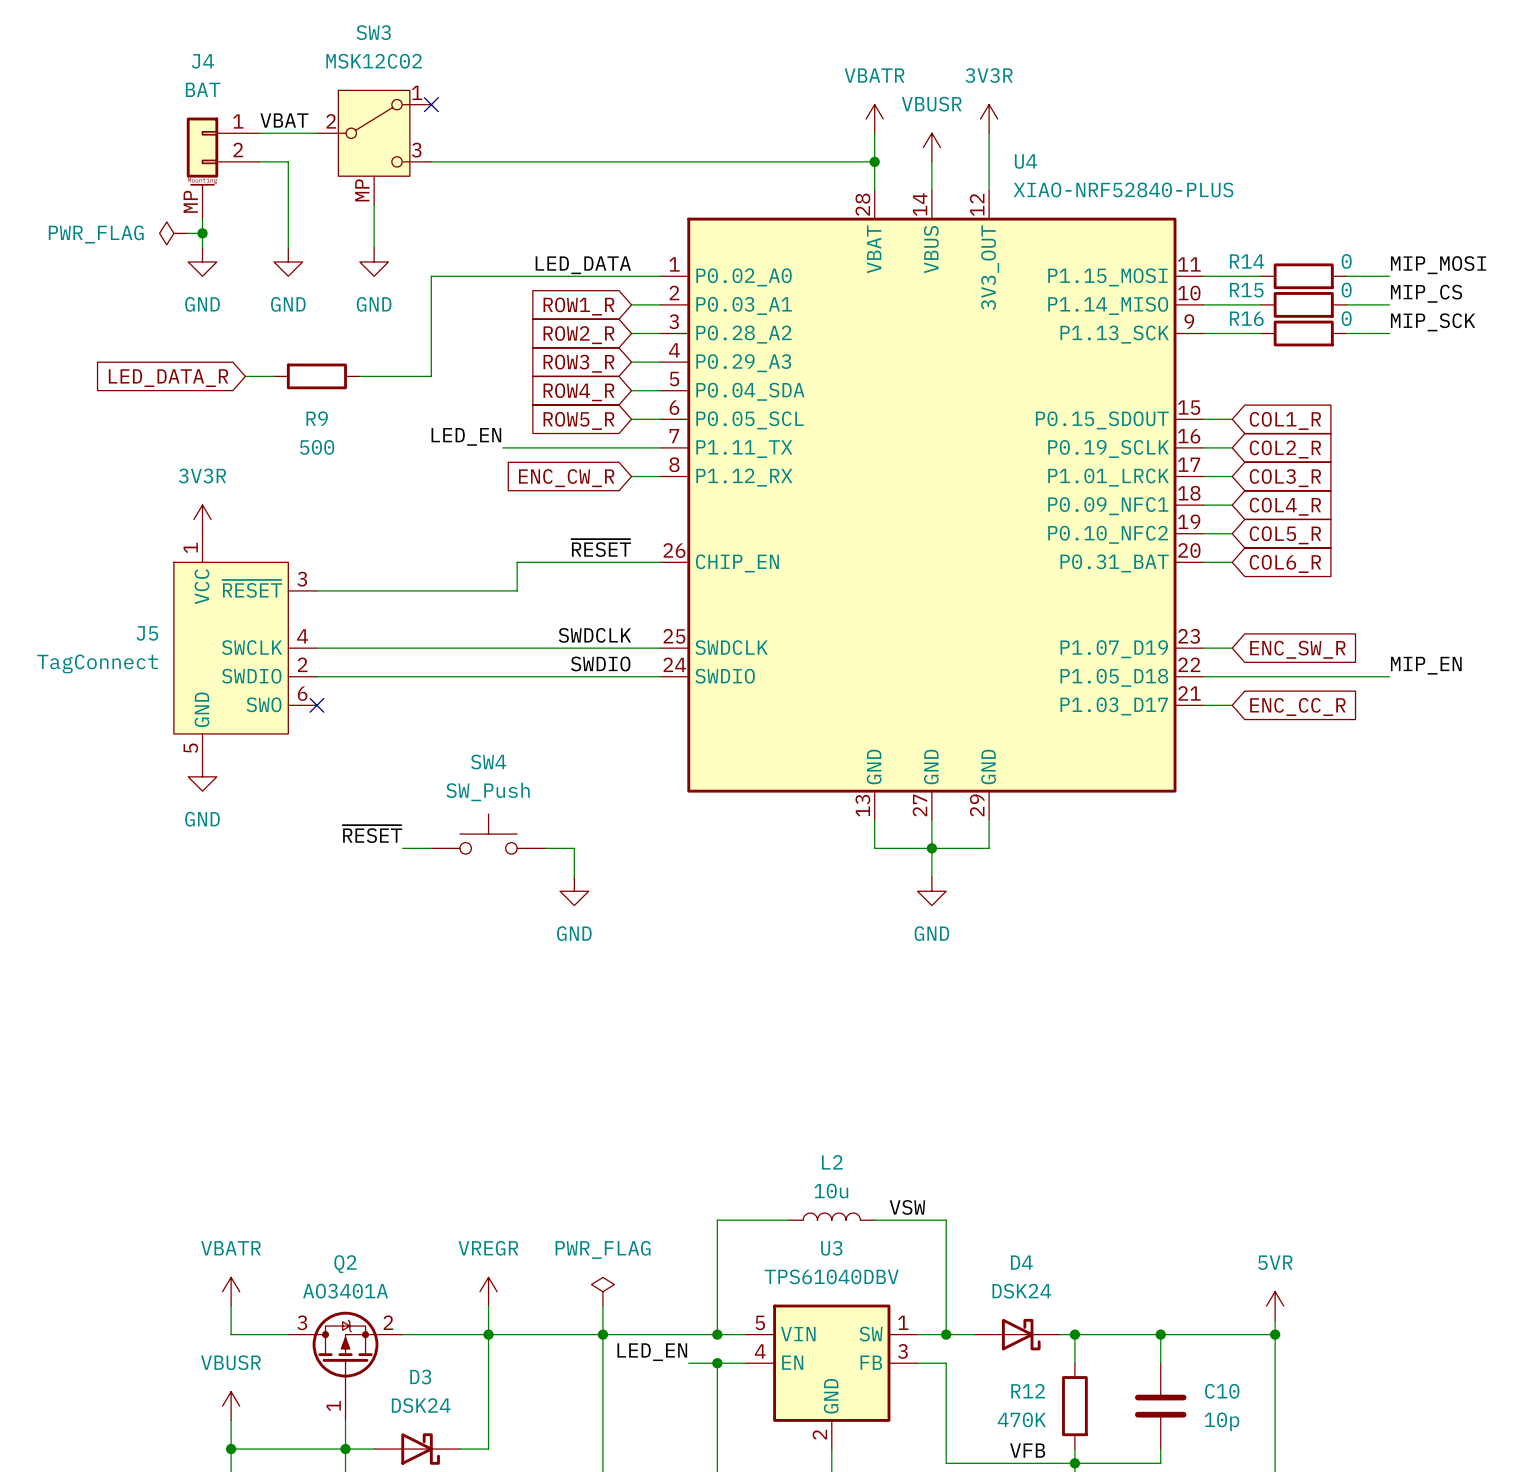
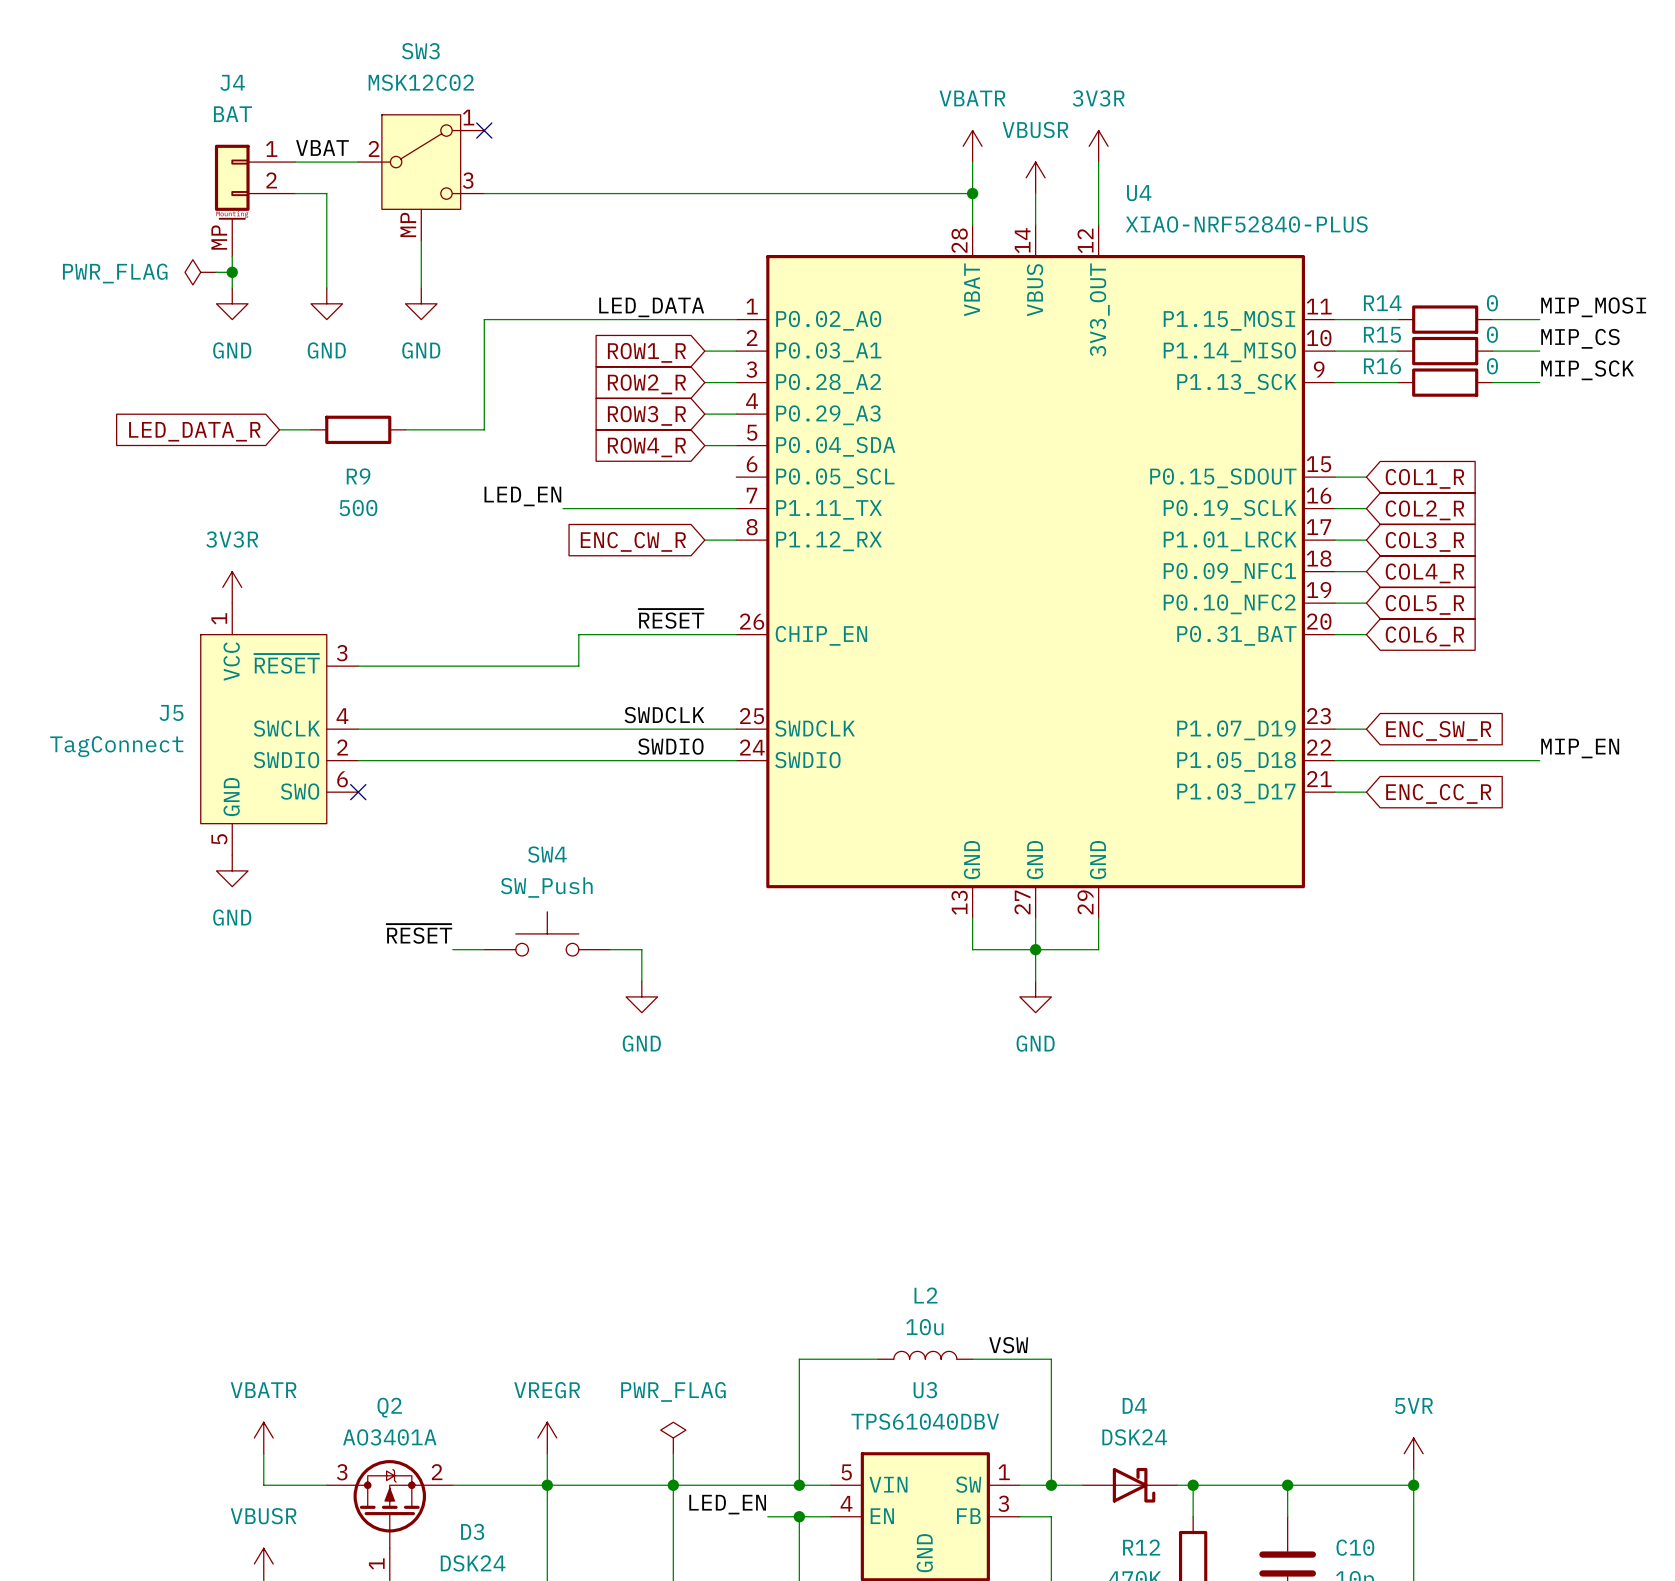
wire: (631, 419) (660, 419) -> none
global label: ROW5_R (578, 420) -> none

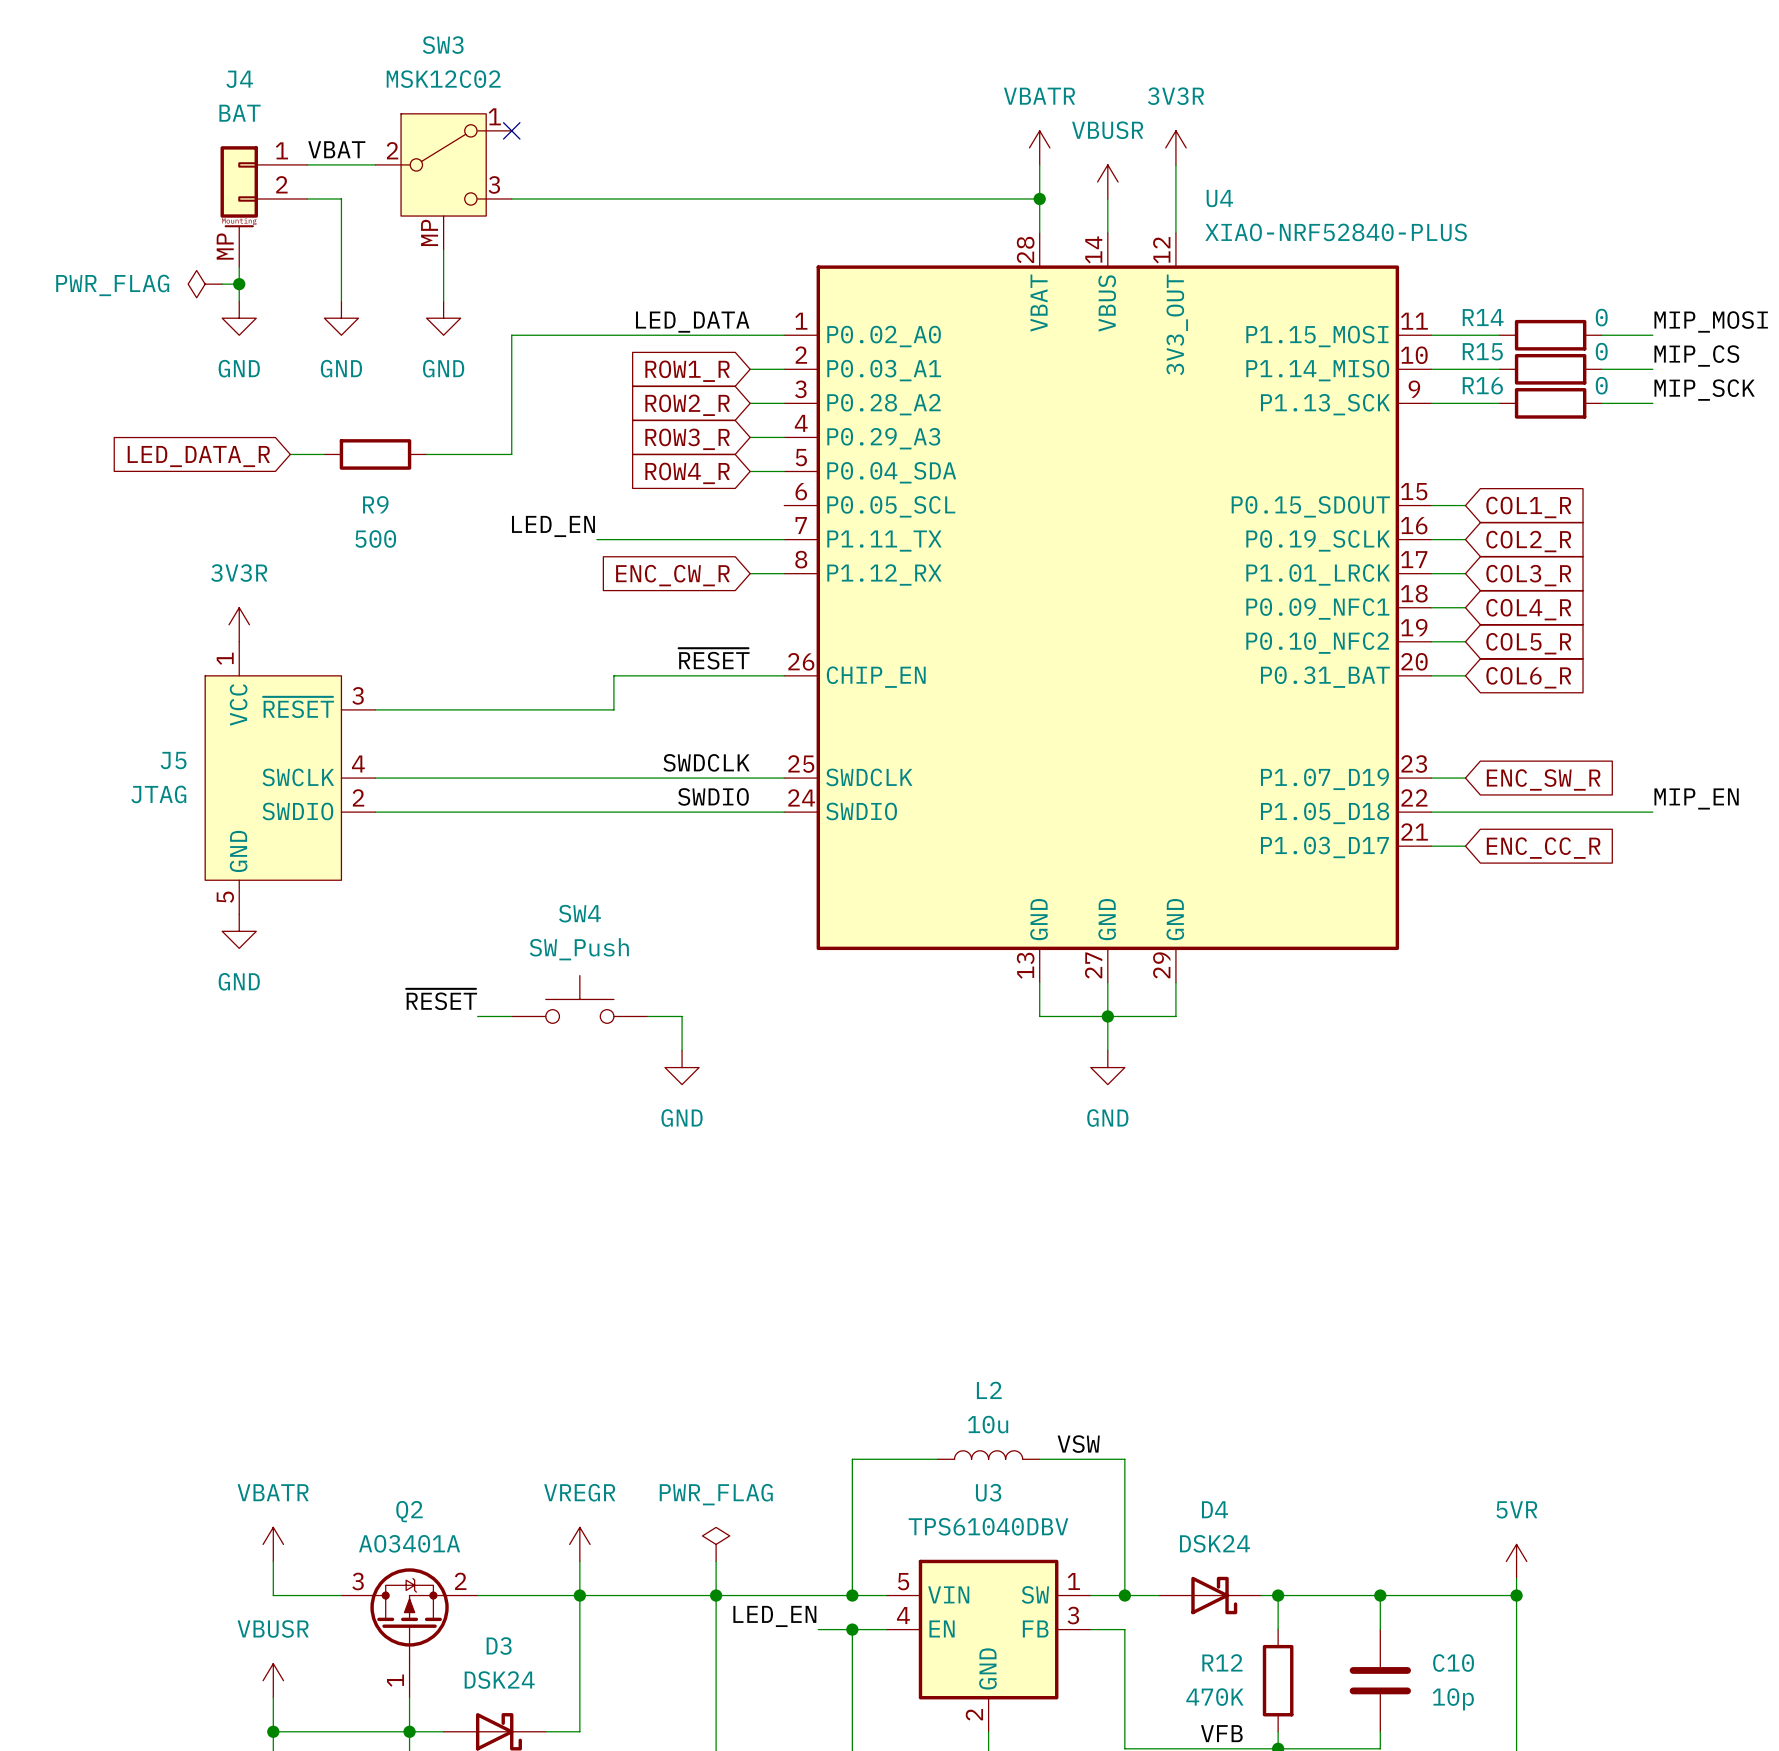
J5 symbol: [200, 603, 359, 856] -> [205, 641, 376, 915]
J5 value: TagConnect (116, 746) -> JTAG (158, 794)
no-connect mark: (358, 792) -> none

